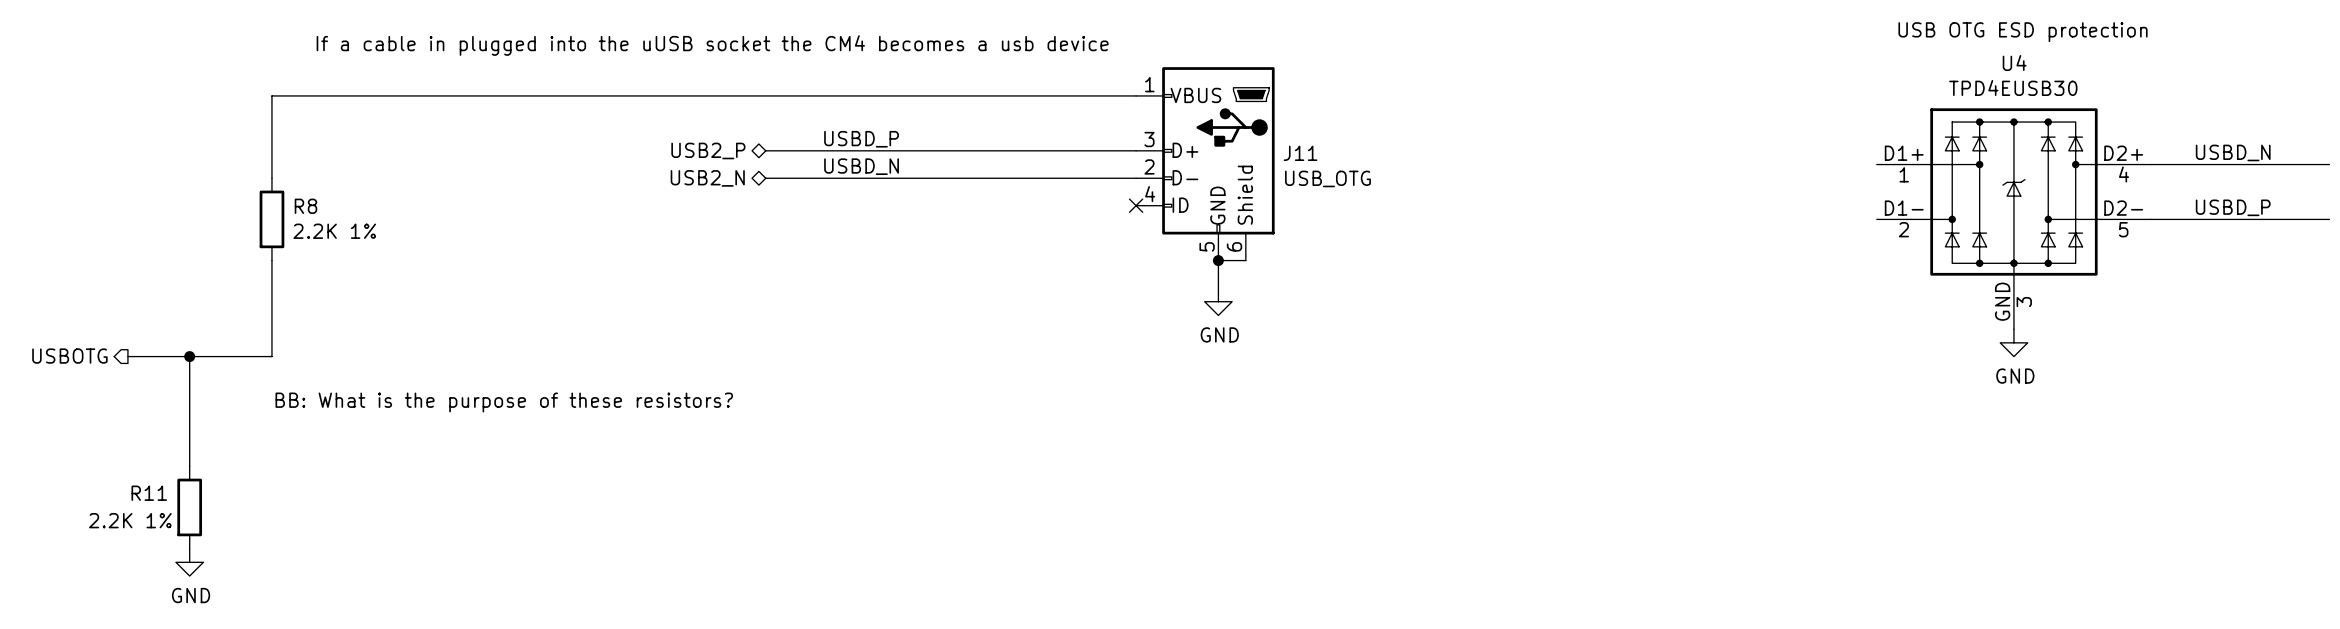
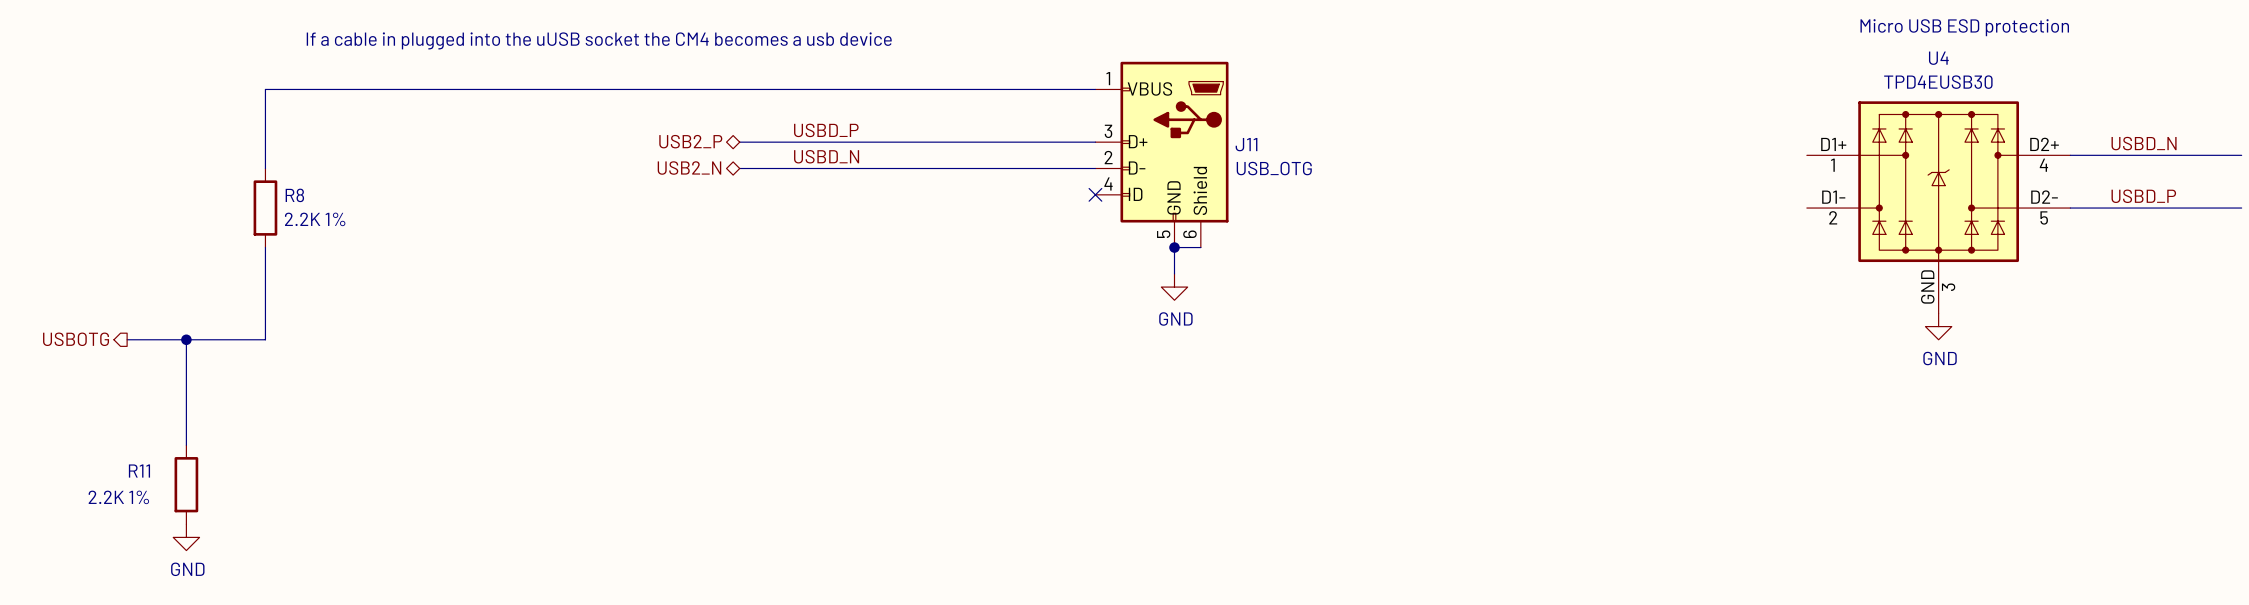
text: USB OTG ESD protection (2023, 32) -> Micro USB ESD protection (1964, 27)
text: BB: What is the purpose of these resistors? (504, 402) -> none

